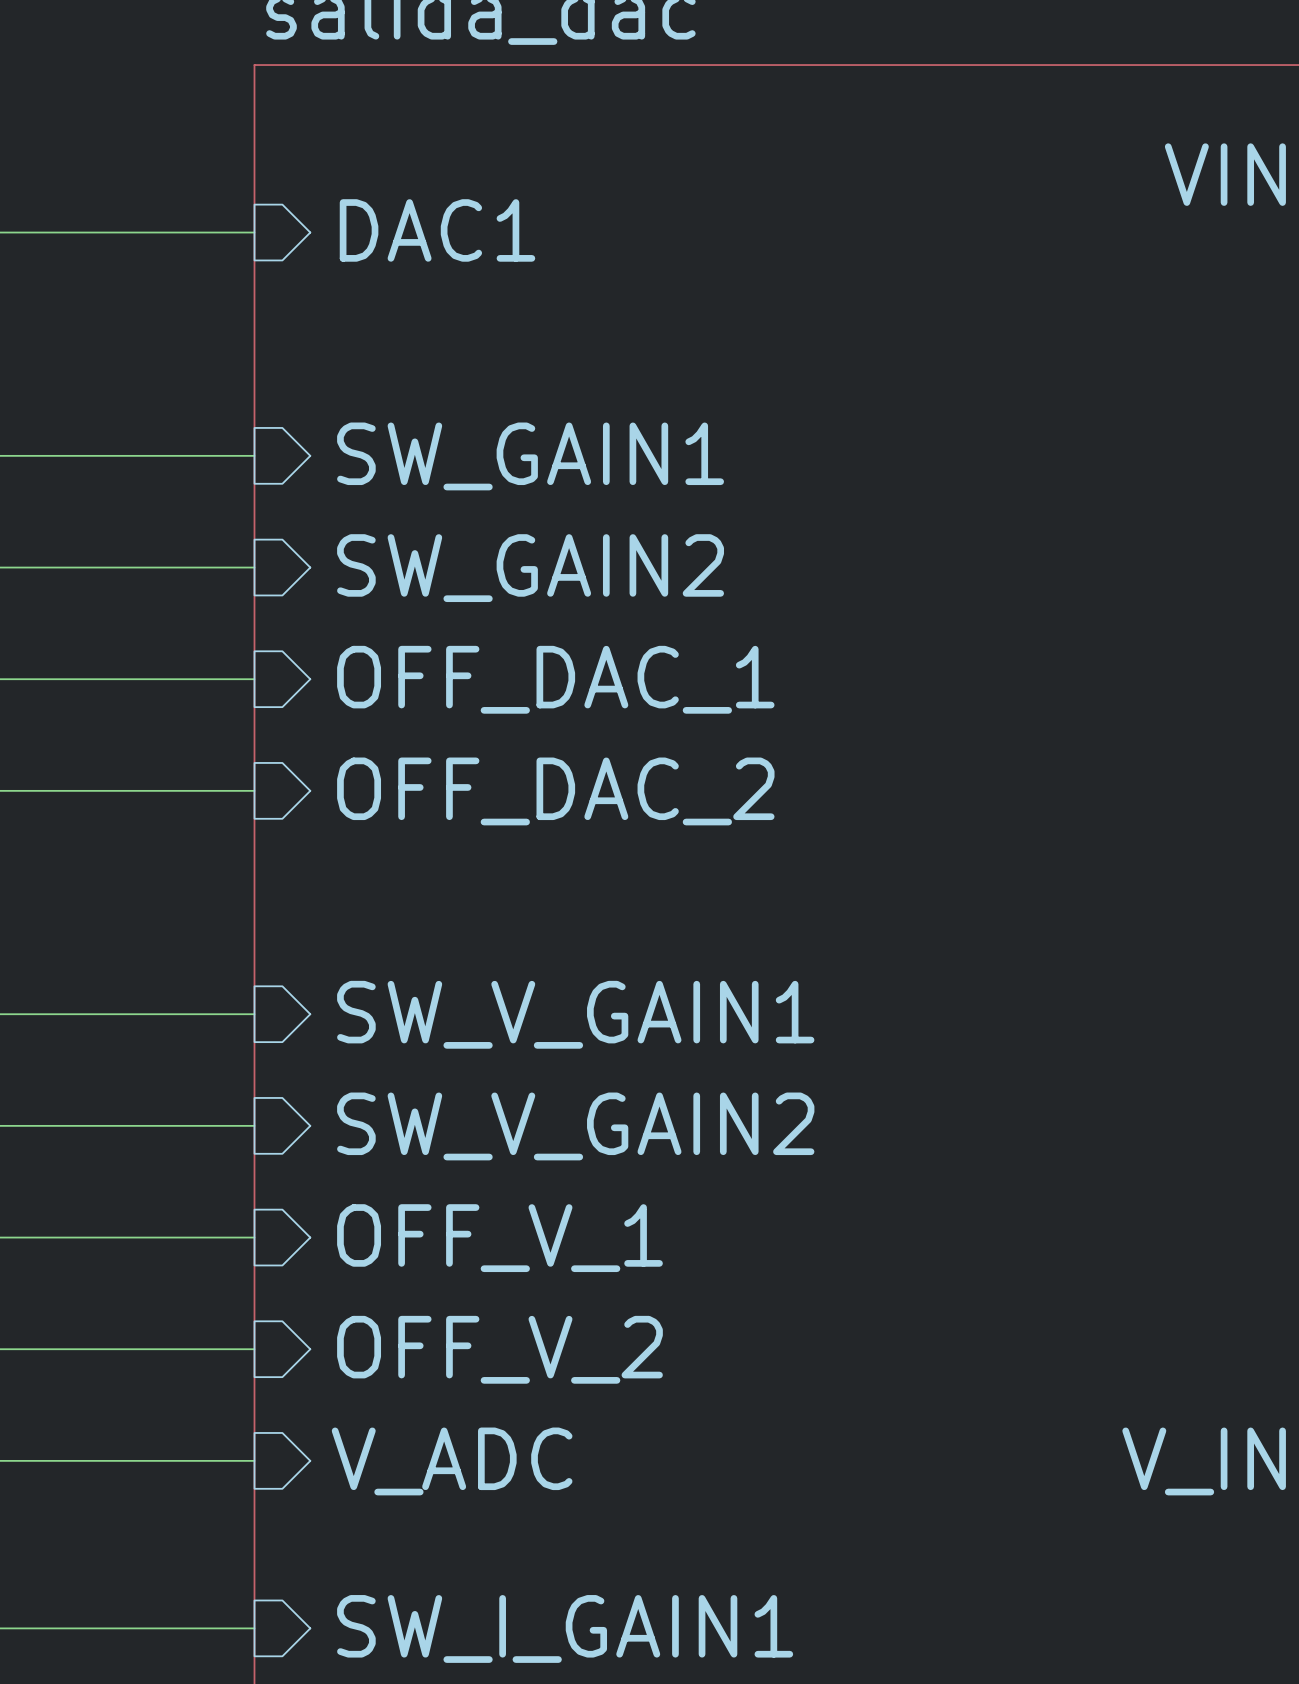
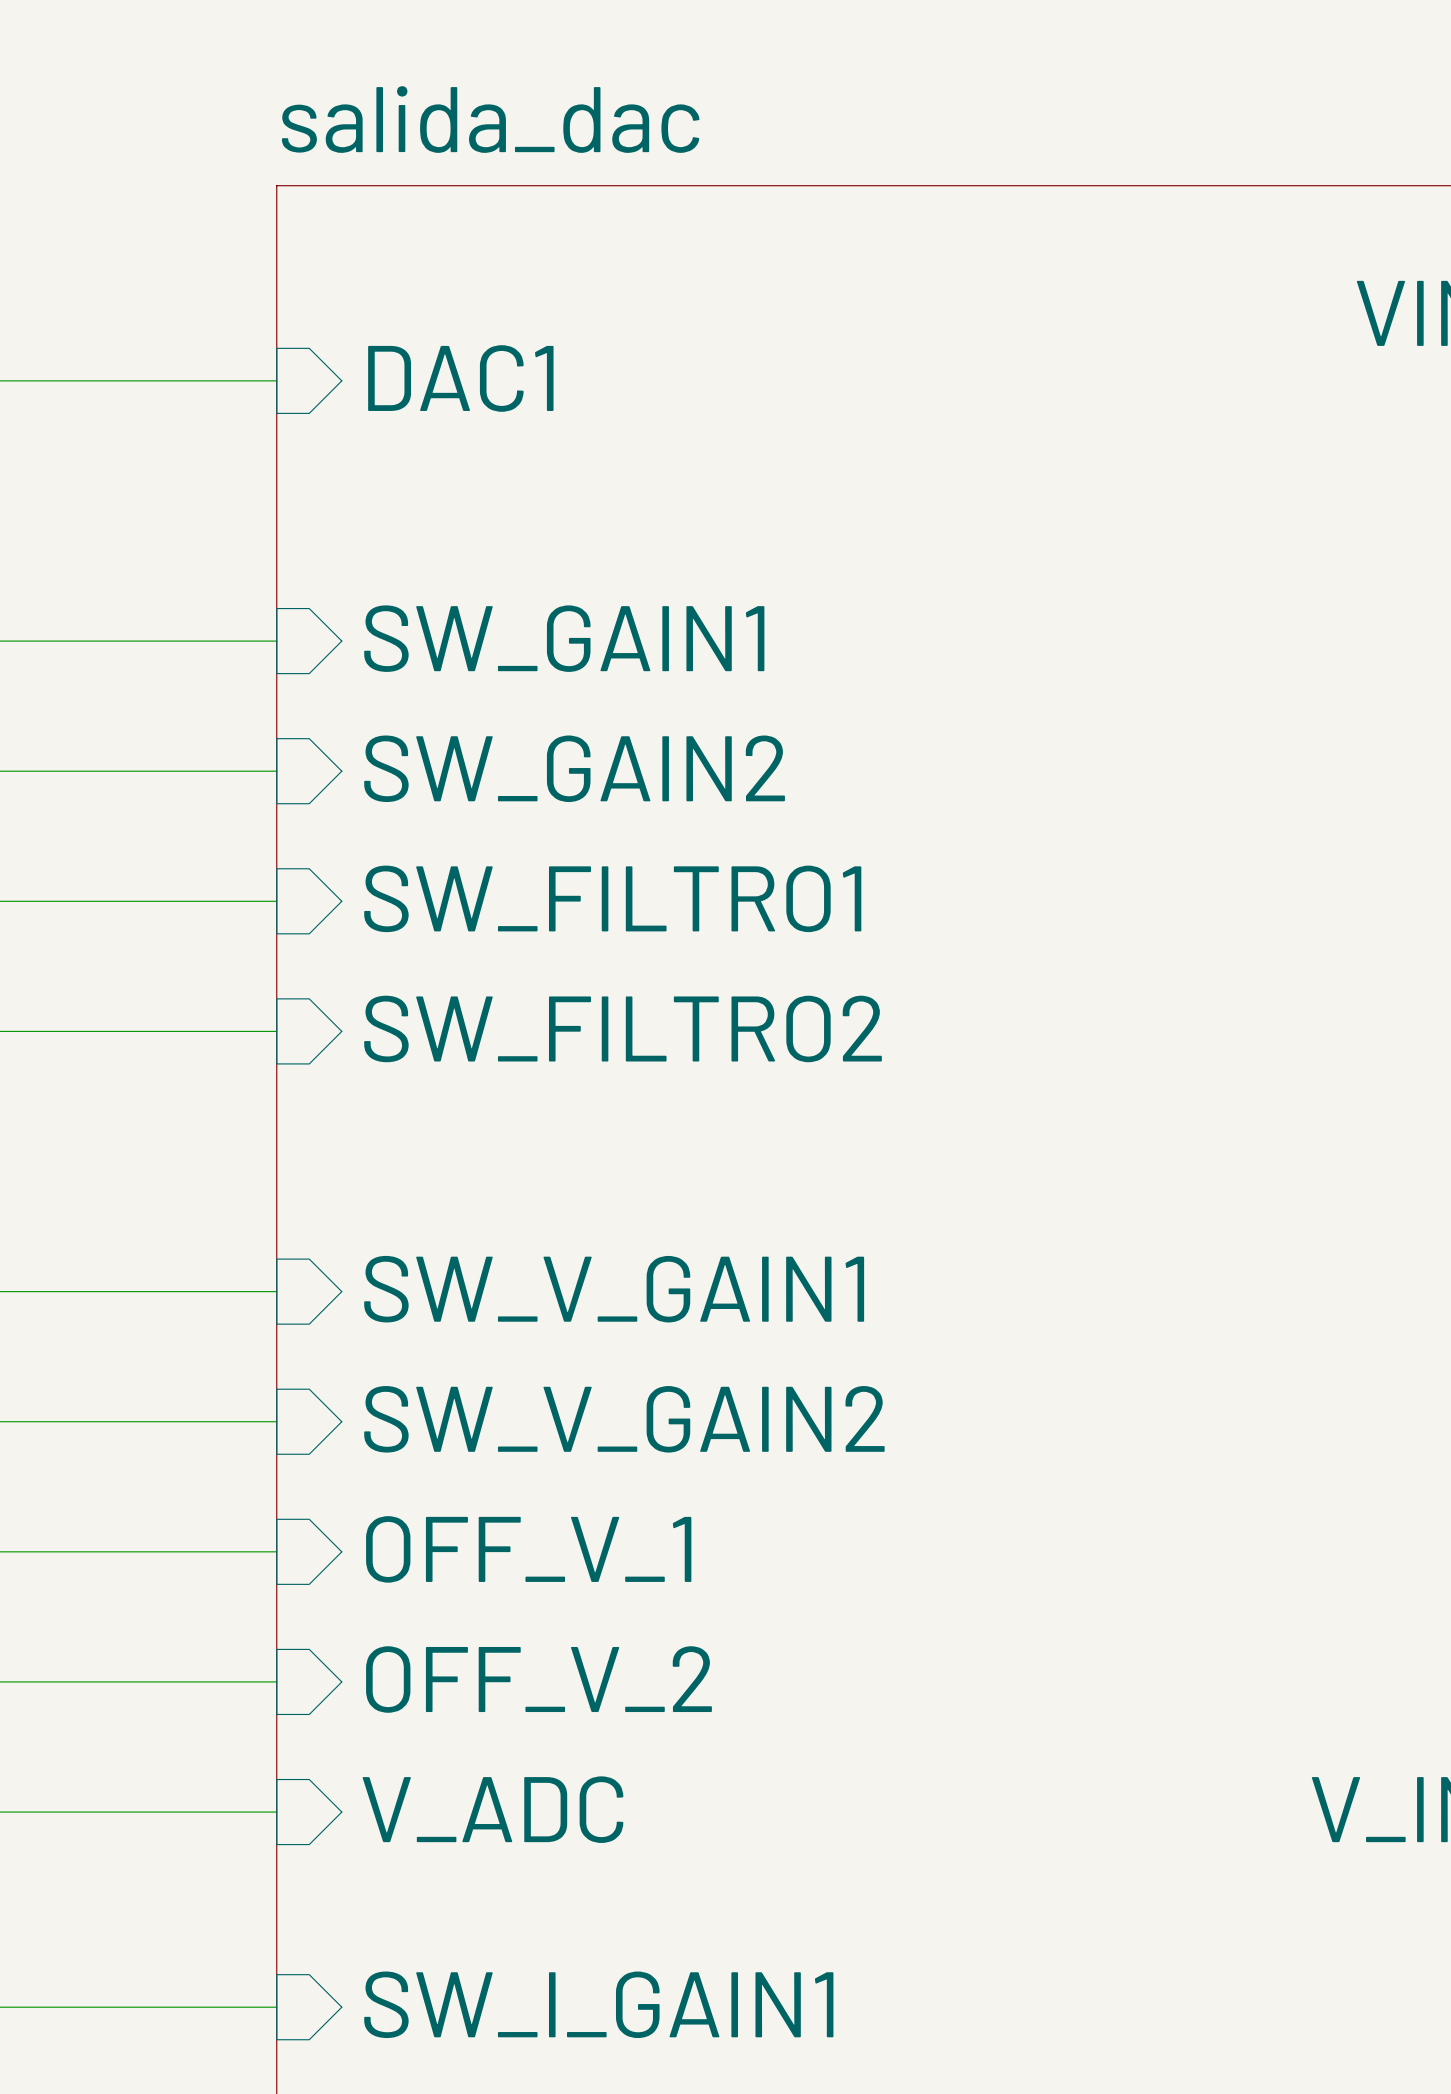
sheet pin: OFF_DAC_1 (555, 679) -> SW_FILTRO1 (612, 898)
sheet pin: OFF_DAC_2 (555, 791) -> SW_FILTRO2 (623, 1028)

